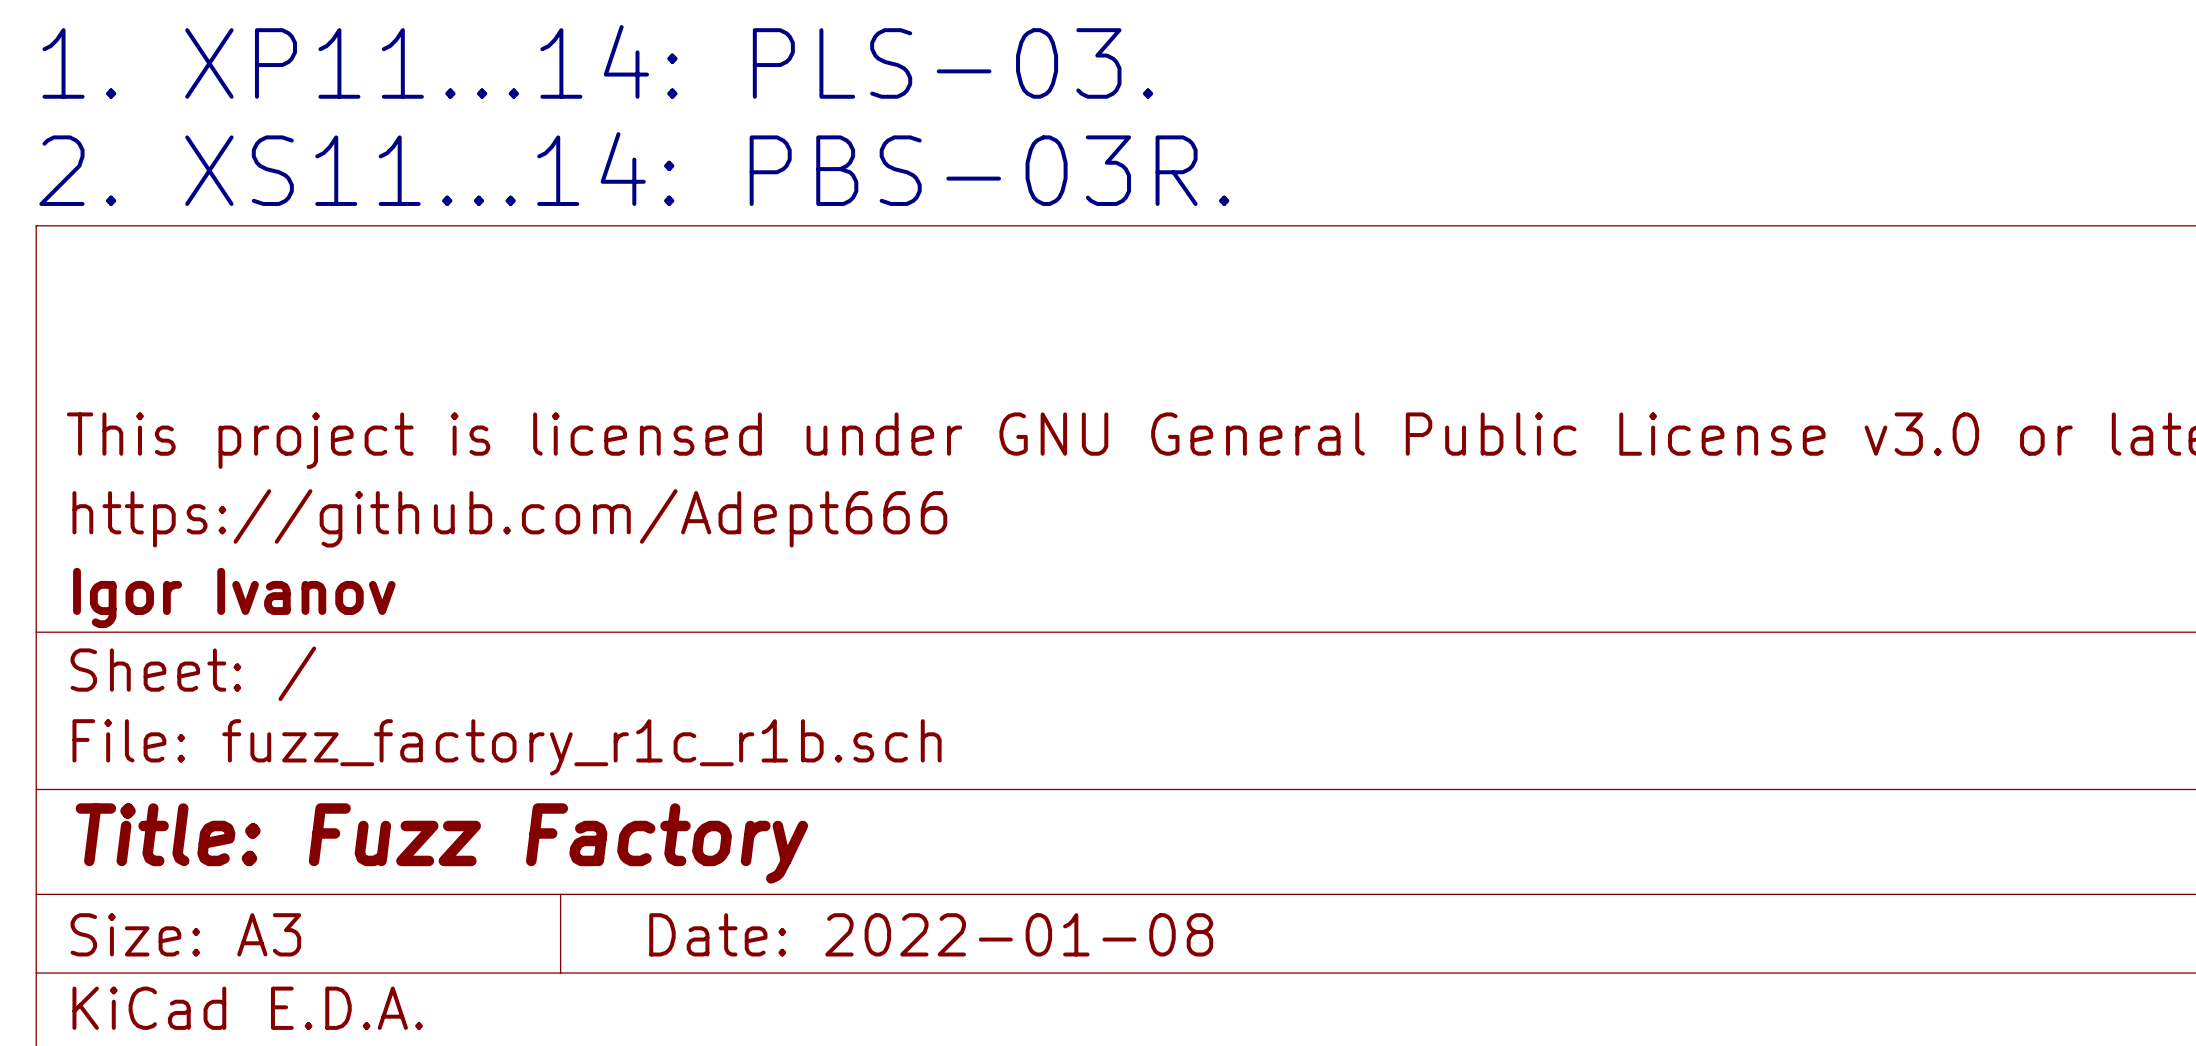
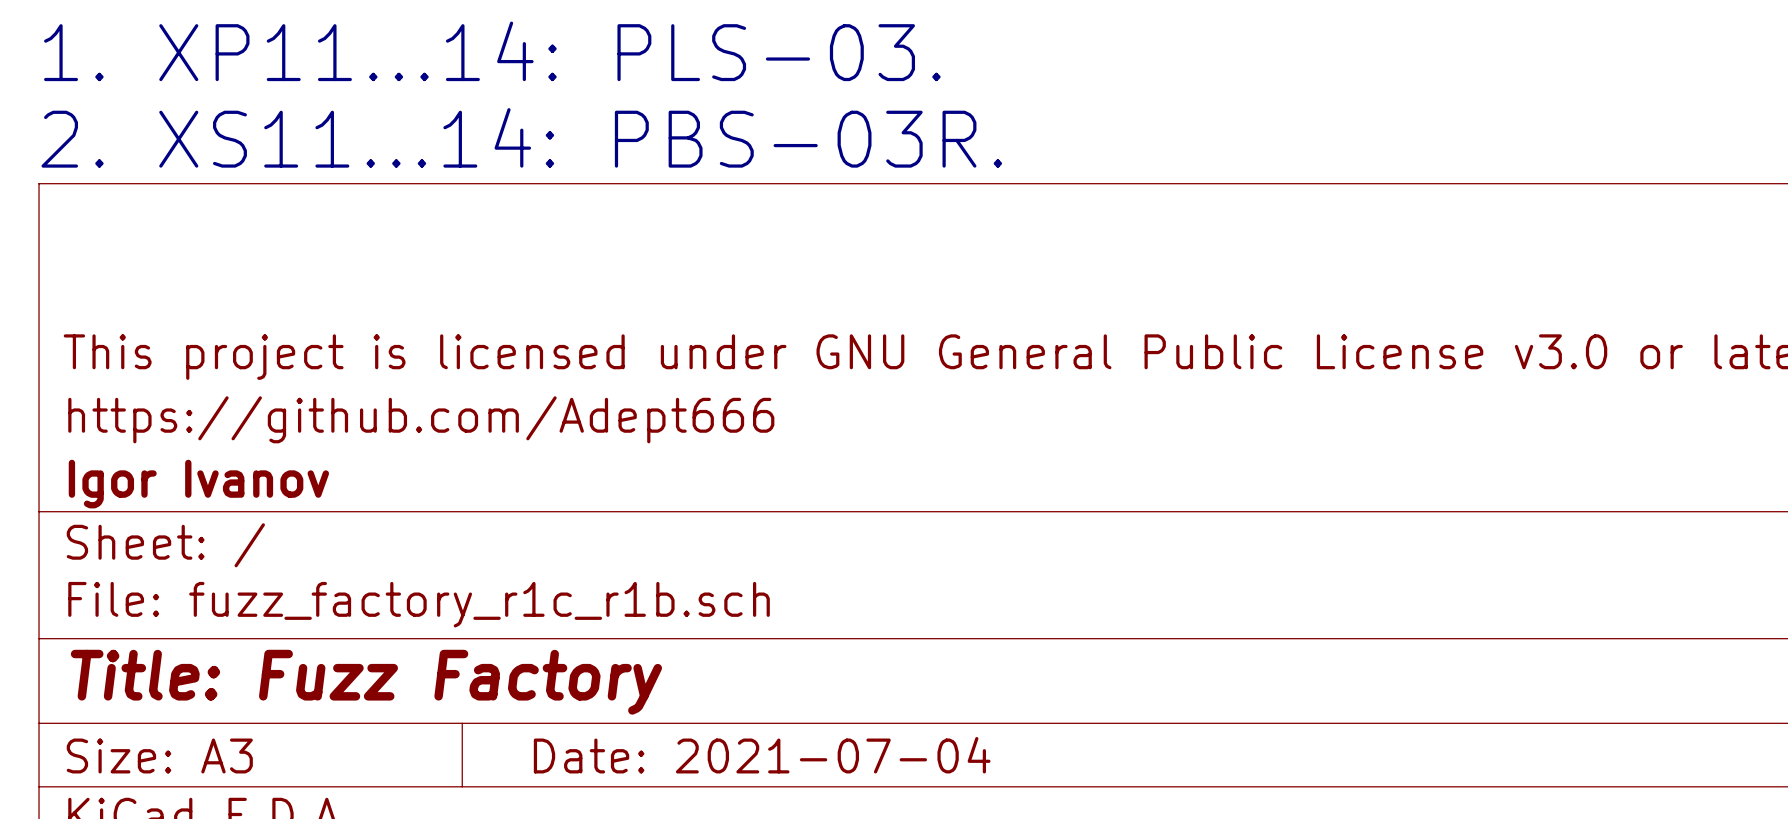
title block: Date: 2022-01-08 (931, 934) -> Date: 2021-07-04 (762, 755)

